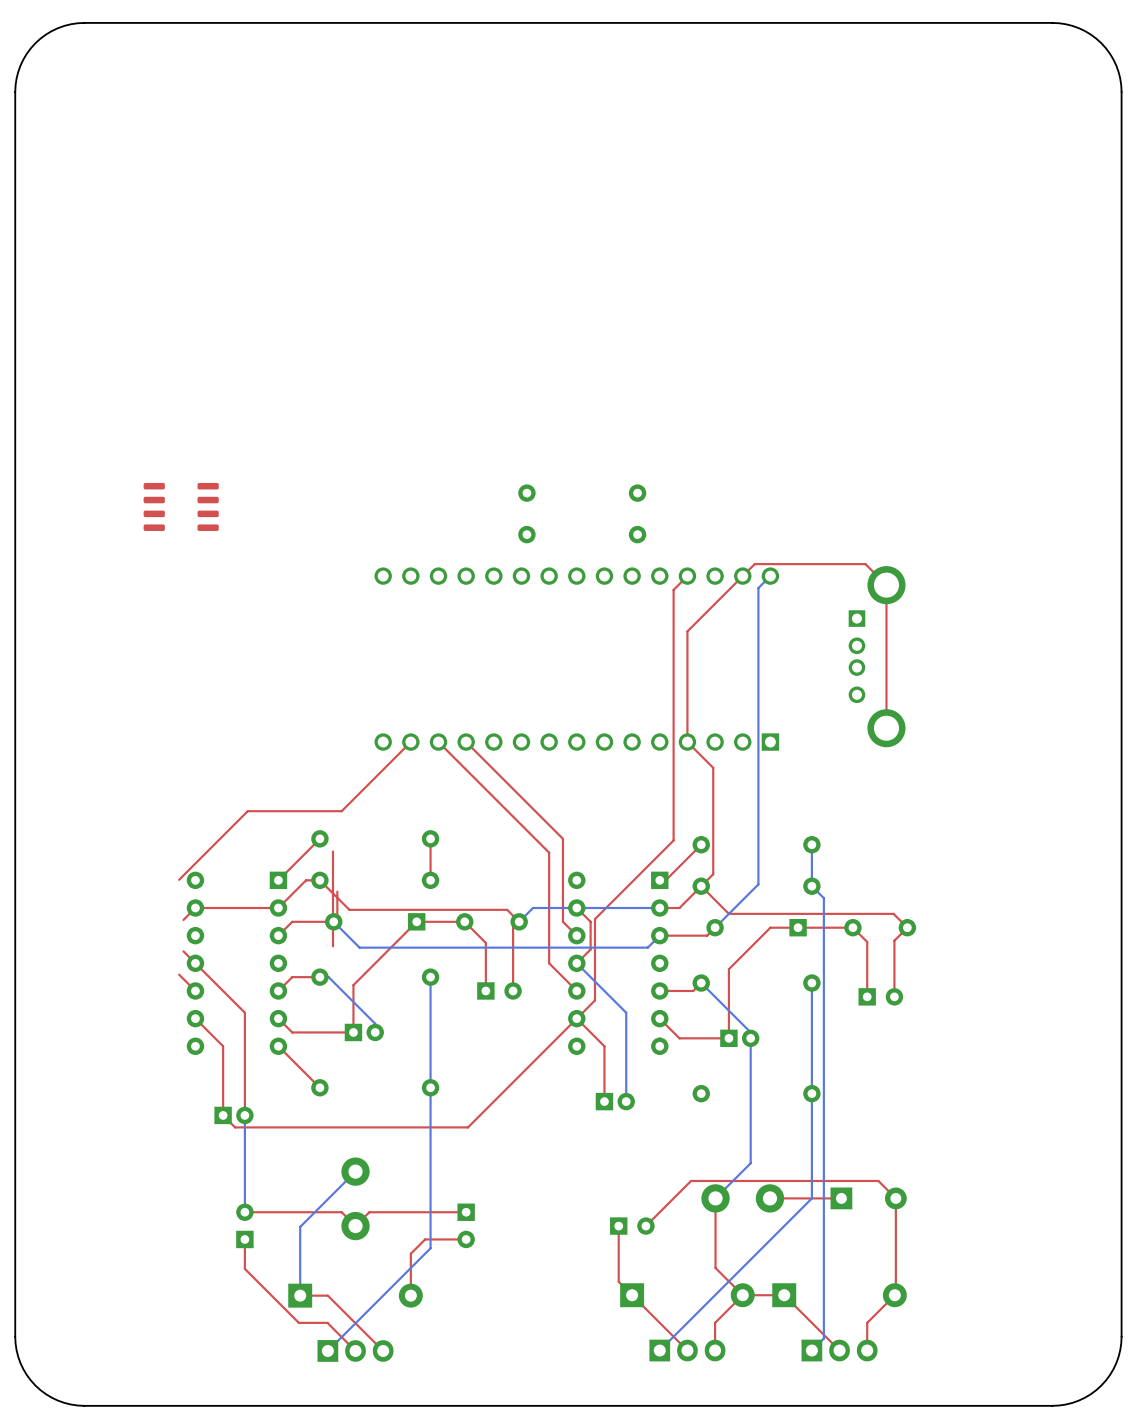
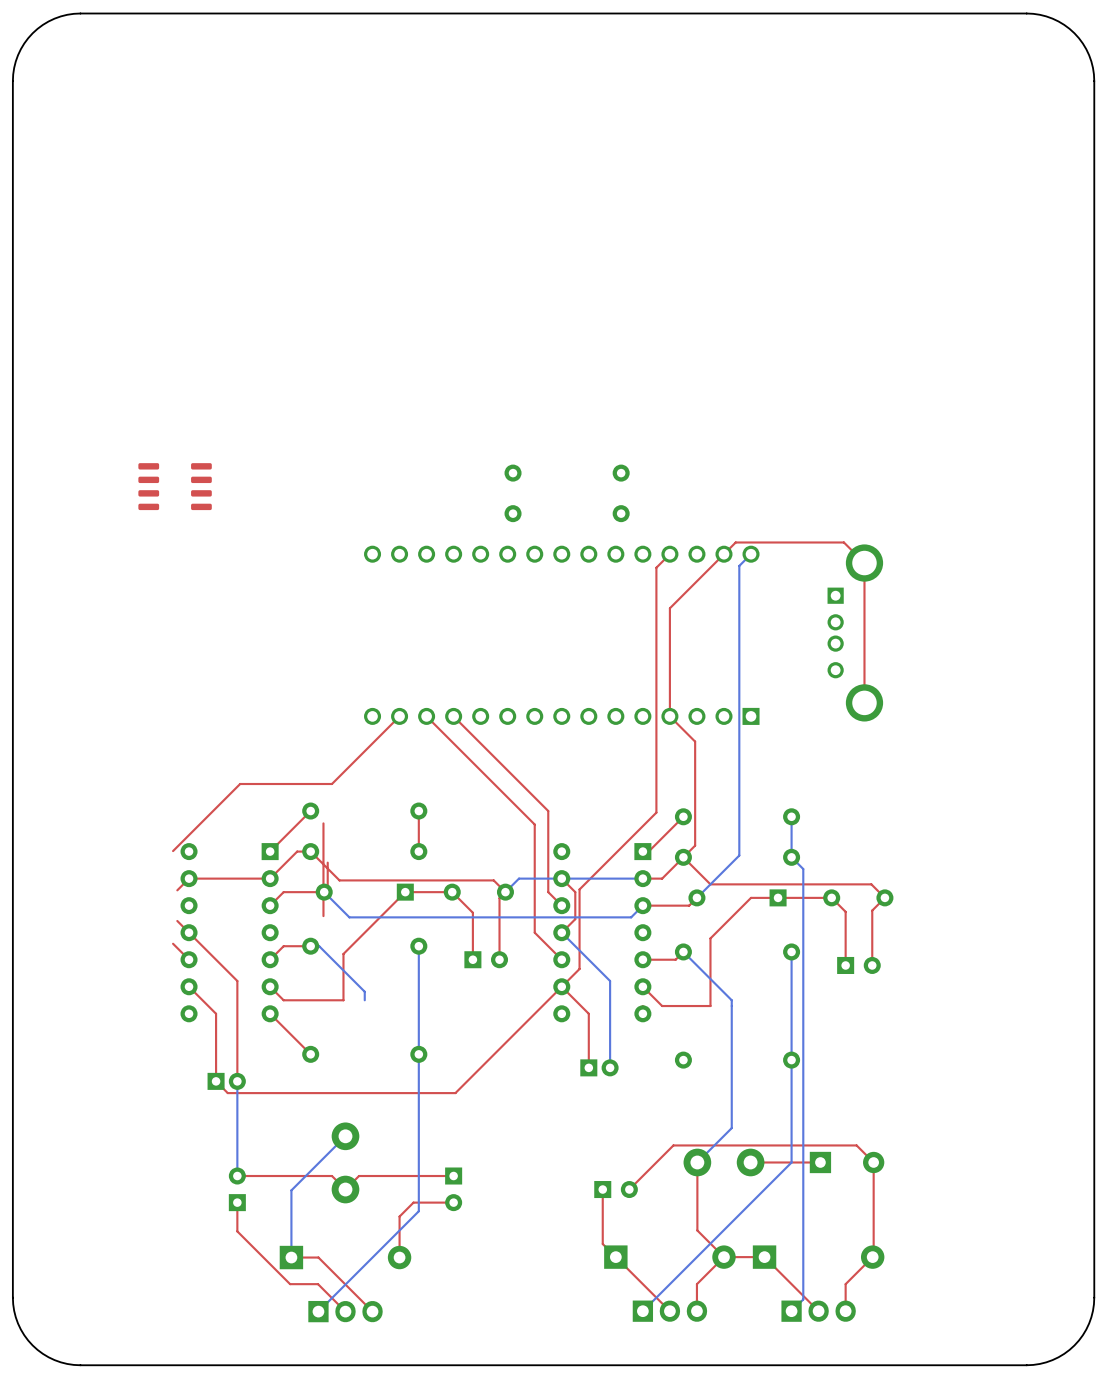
part: (364, 1032) -> none
part: (739, 1038) -> none

